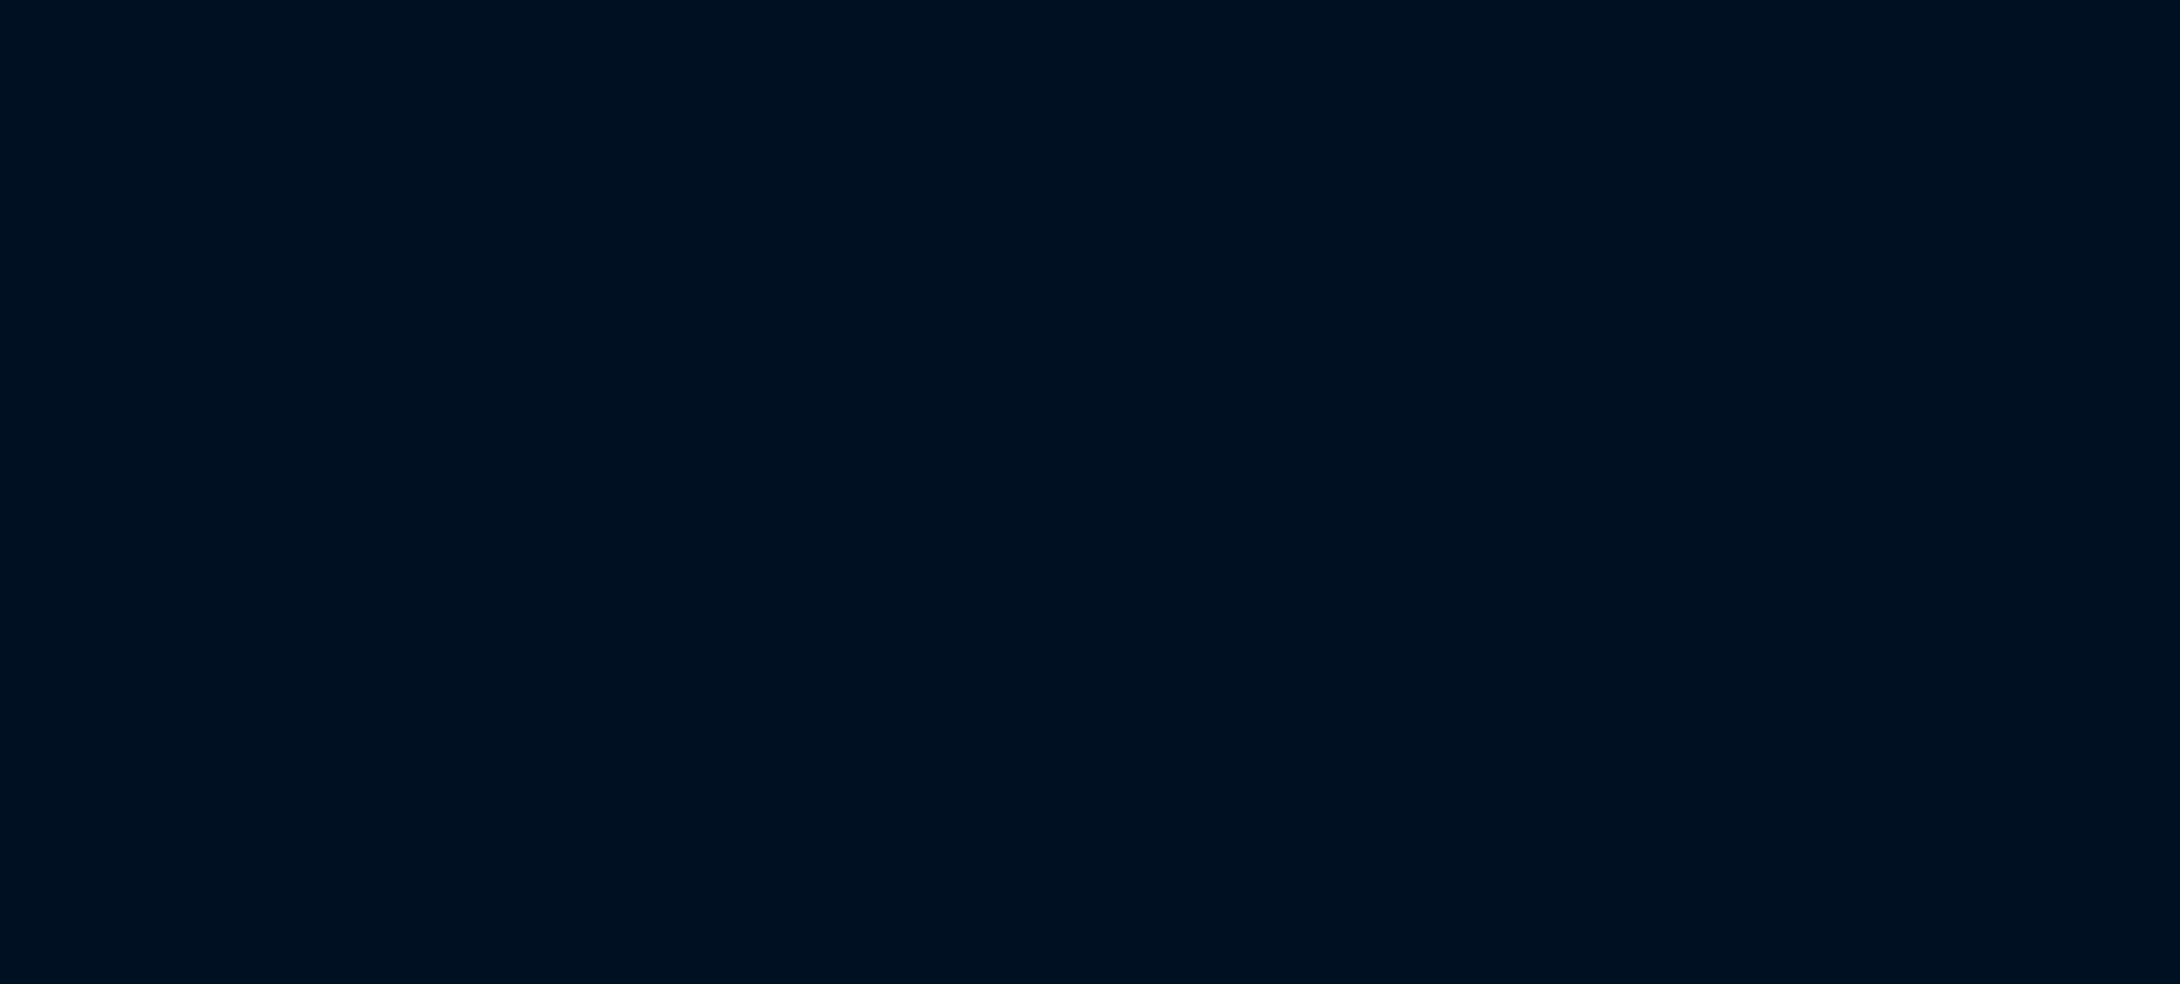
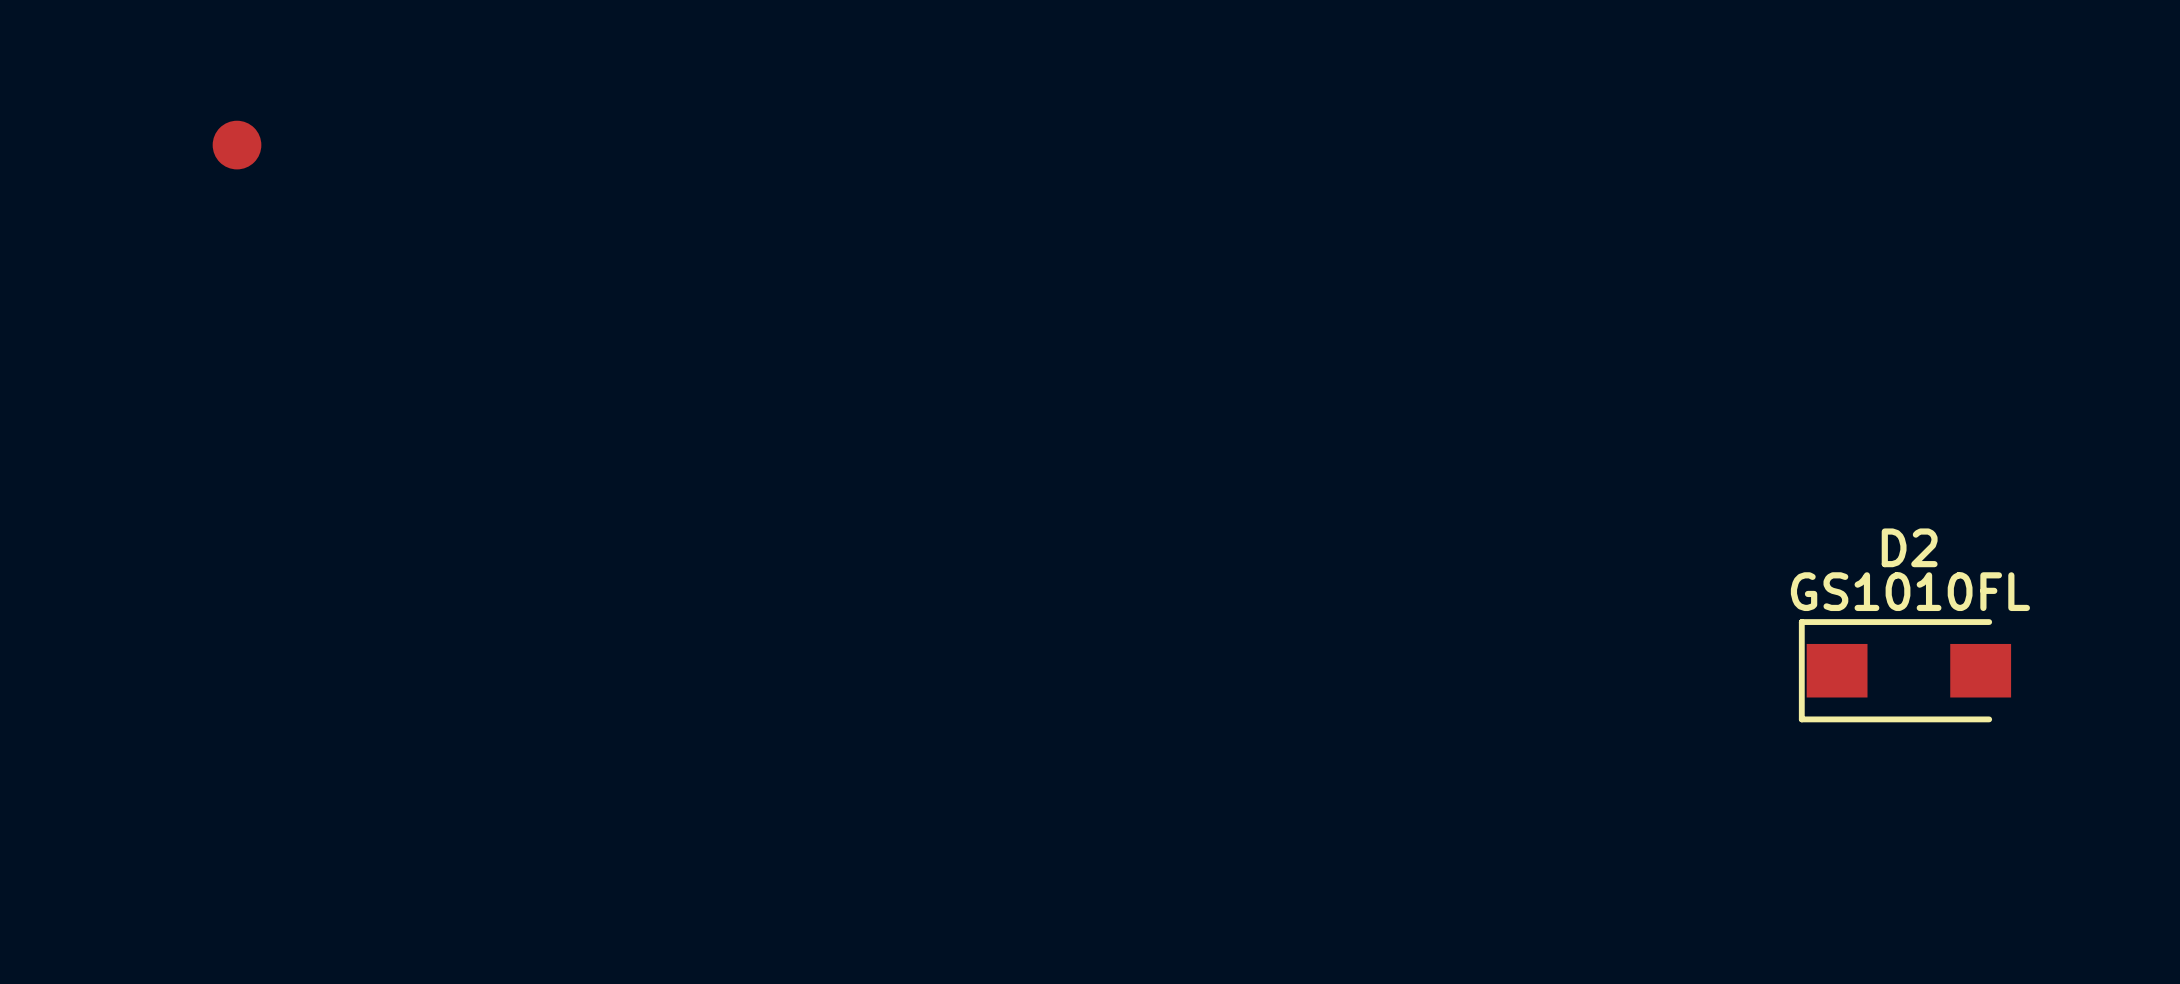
part: none -> (237, 145)
D2: none -> GS1010FL (1904, 670)

